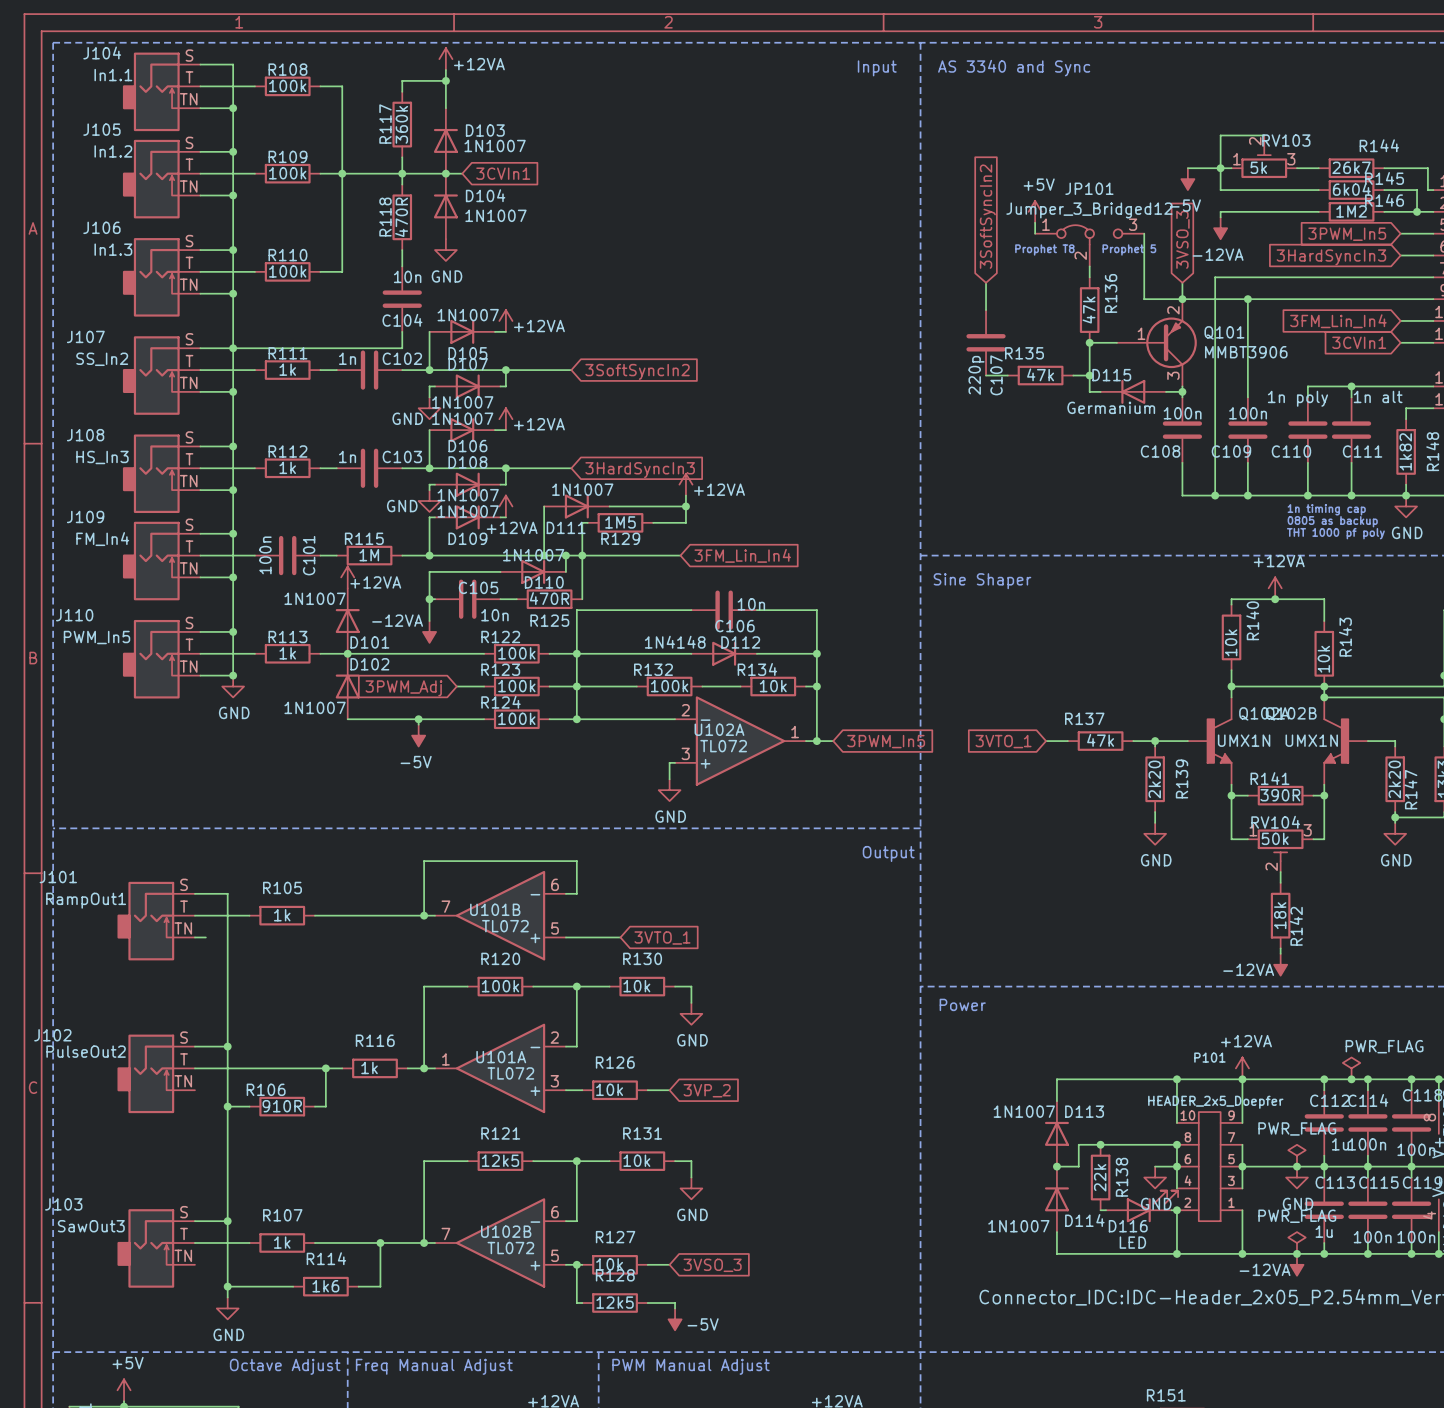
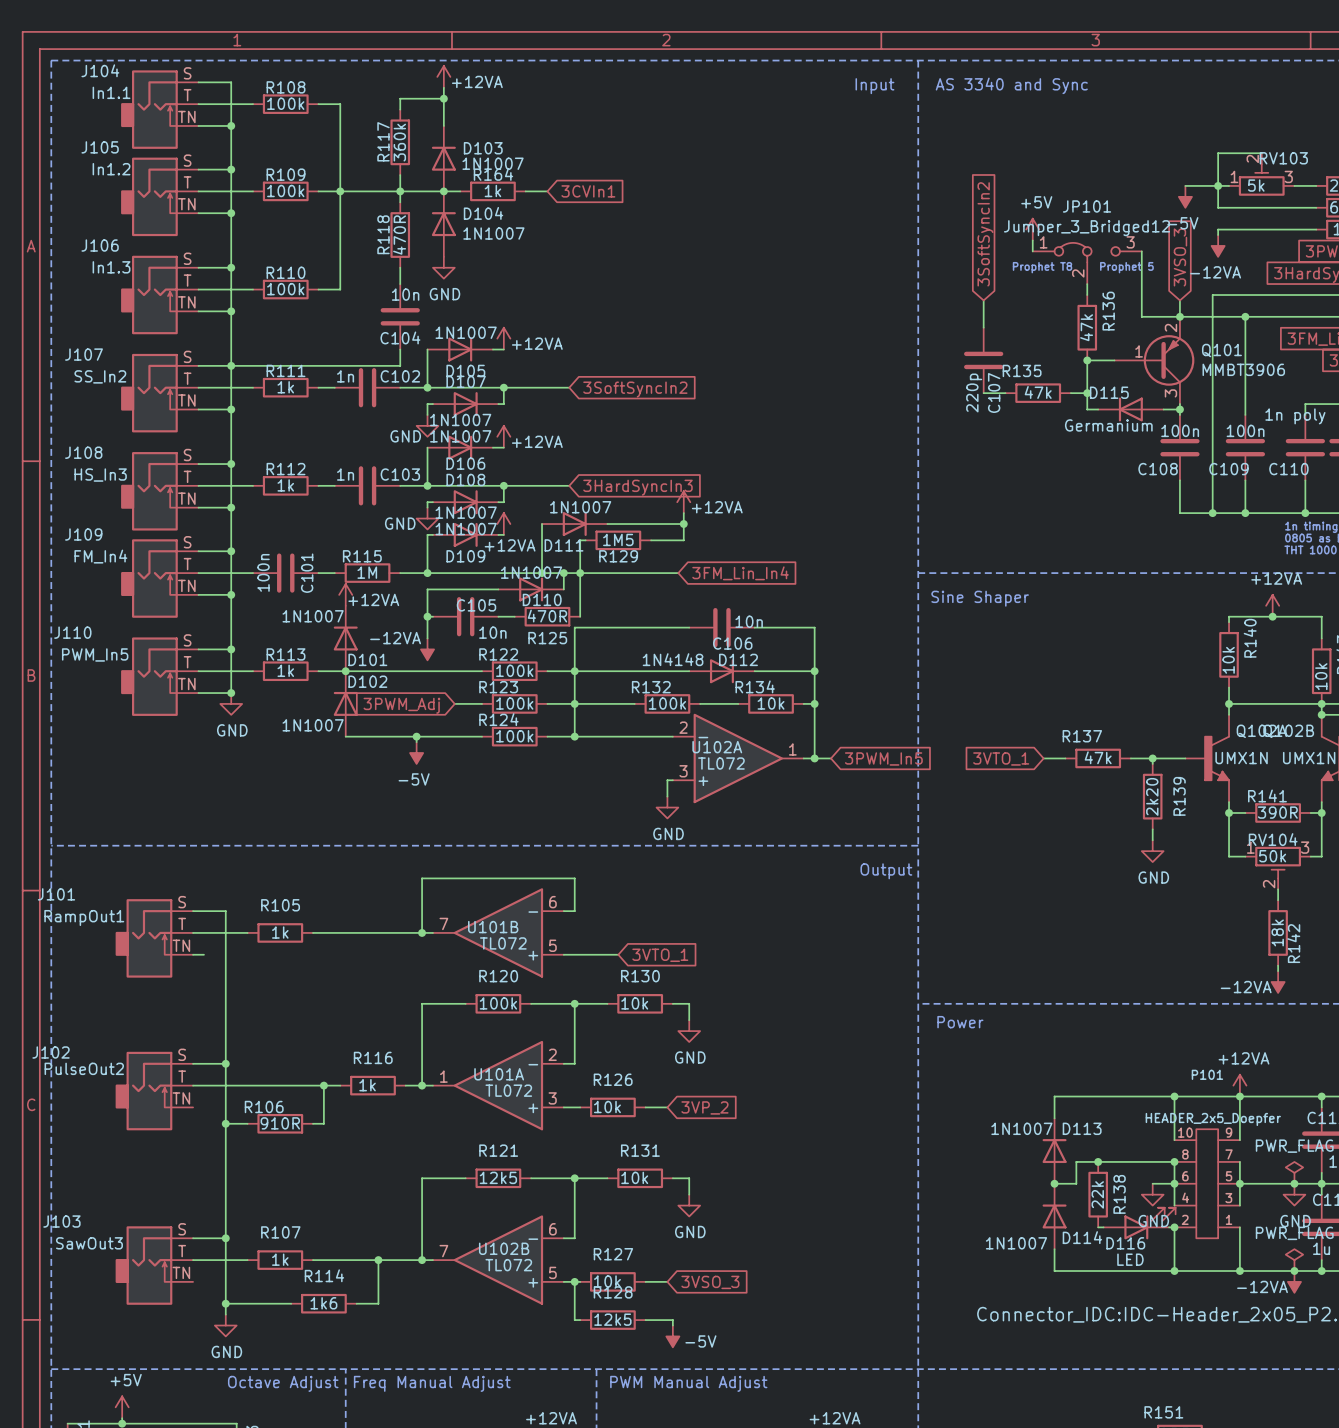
R164: none -> 1k (492, 191)
global label position: 3CVIn1 (503, 173) -> 3CVIn1 (588, 191)
wire: none -> (525, 191) (547, 191)

